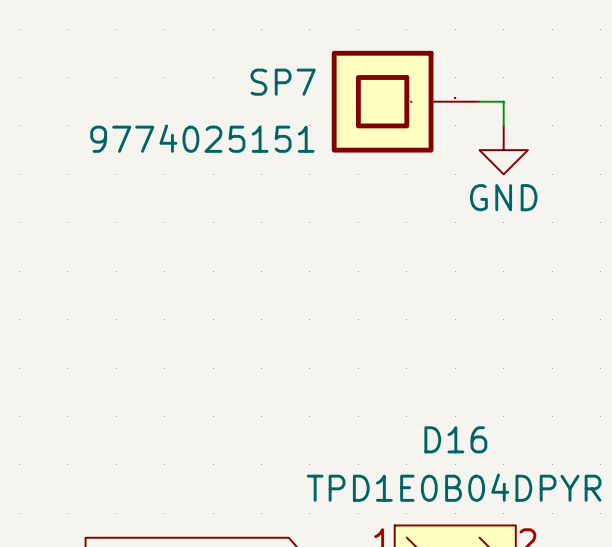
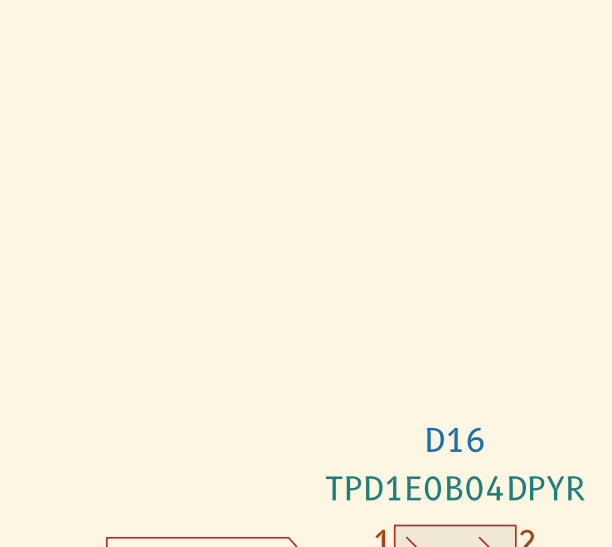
SP7: 9774025151 (405, 101) -> none
wire: (479, 101) (503, 101) (503, 125) -> none
power symbol: GND (503, 150) -> none

